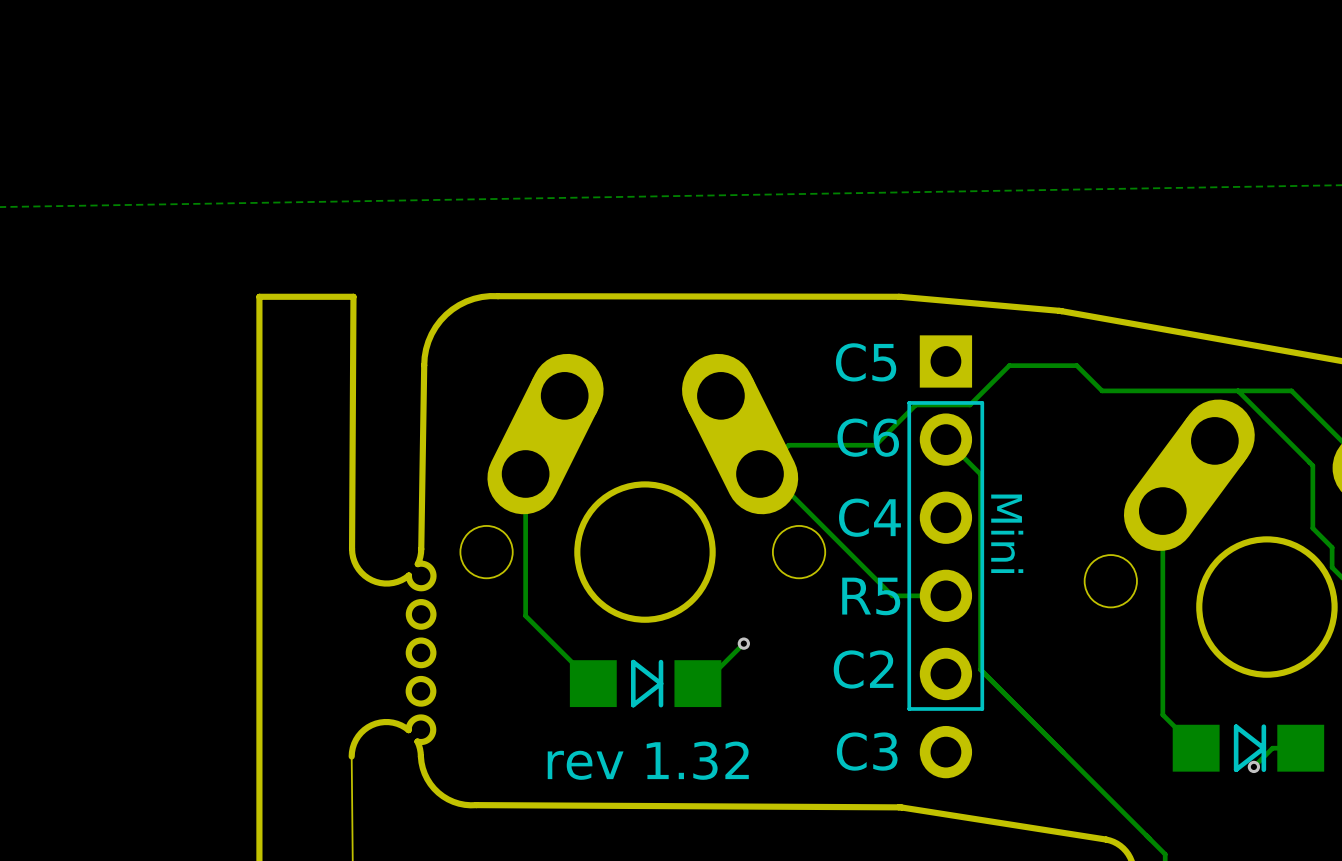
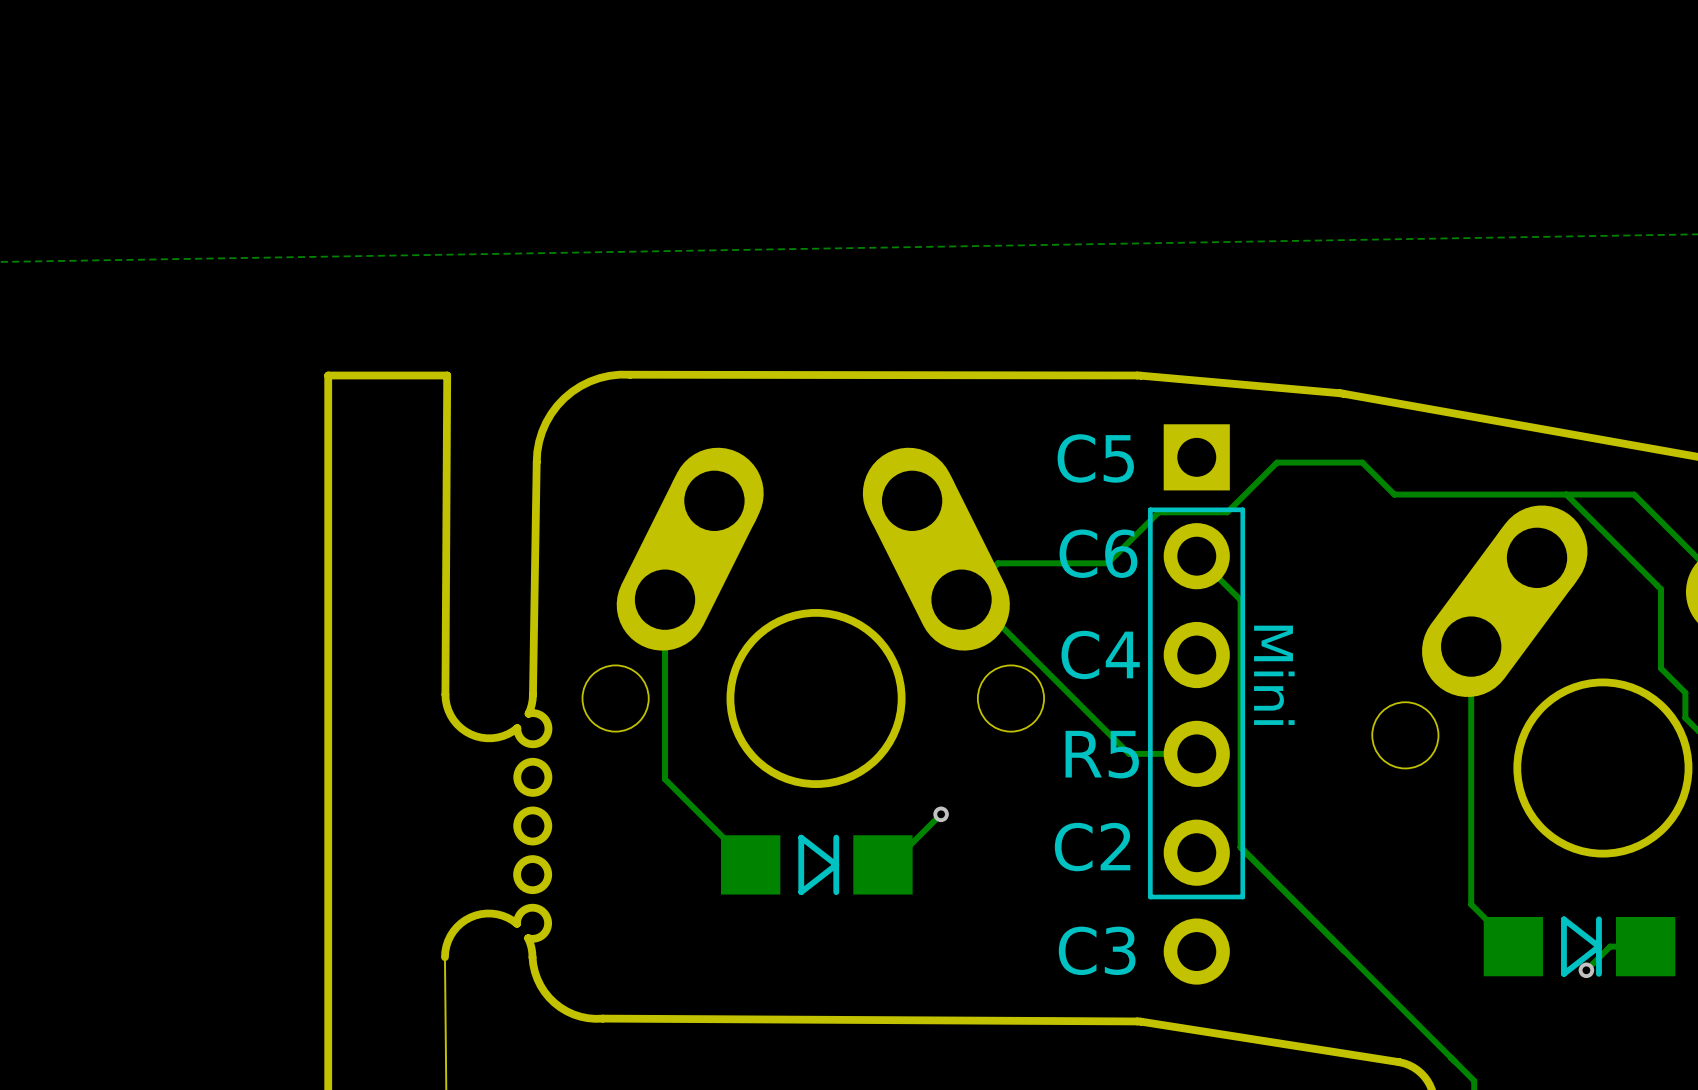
text: rev 1.32 (648, 760) -> none

